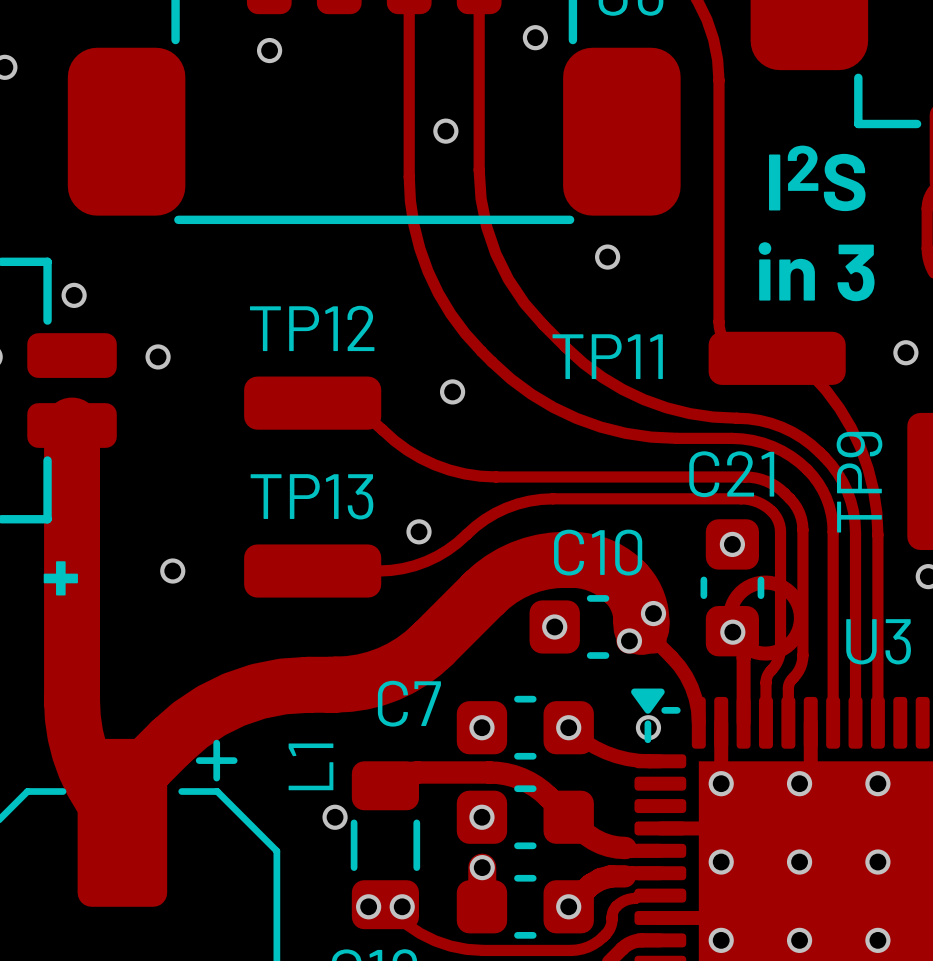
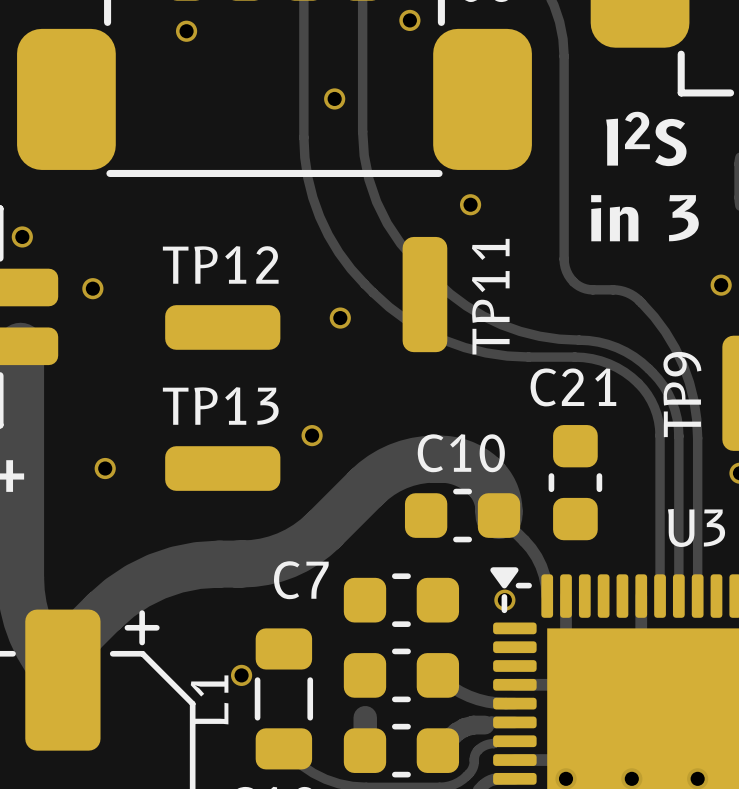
TP11 name position: TP11 (607, 356) -> TP11 (490, 296)
TP11 rotation: 0° (777, 358) -> 90° clockwise (424, 294)
TP11 position: (777, 358) -> (424, 294)
track: (312, 403) (329, 403) (352, 410) (373, 422) (394, 440) (420, 458) (449, 470) (464, 473) (496, 476) (745, 476) (761, 479) (776, 486) (797, 507) (802, 529) (802, 659) (798, 670) (788, 685) (788, 722) -> none
via: (732, 544) -> none
track: (312, 571) (390, 570) (414, 565) (447, 550) (475, 526) (495, 513) (529, 501) (553, 498) (741, 498) (753, 500) (765, 506) (774, 514) (780, 531) (780, 650) (776, 662) (766, 679) (765, 722) -> none
via: (653, 613) -> none
via: (554, 626) -> none
track: (732, 631) (729, 617) (732, 604) (740, 592) (752, 585) (765, 582) (779, 585) (790, 593) (798, 604) (800, 618) (798, 631) (790, 643) (779, 650) (765, 653) (752, 651) (744, 646) (740, 643) (732, 632) (739, 640) (740, 644) (742, 647) (743, 654) (743, 722) -> none
via: (732, 632) -> none
via: (629, 640) -> none
via: (481, 727) -> none
track: (568, 727) (586, 741) (605, 752) (627, 759) (660, 761) -> none
via: (568, 727) -> none
L1 name position: L1 (311, 766) -> L1 (209, 700)
via: (721, 783) -> none
via: (799, 783) -> none
via: (877, 783) -> none
track: (385, 785) (396, 777) (413, 772) (505, 774) (521, 778) (535, 786) (594, 839) (609, 845) (629, 850) (649, 850) -> (437, 675) (452, 687) (469, 696) (487, 701) (505, 703)
via: (481, 817) -> none
via: (721, 862) -> none
via: (799, 862) -> none
via: (877, 862) -> none
via: (482, 867) -> none
via: (368, 906) -> none
via: (402, 906) -> none
via: (568, 906) -> none

